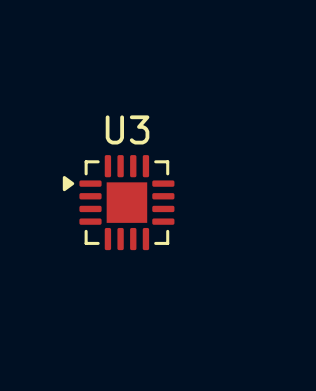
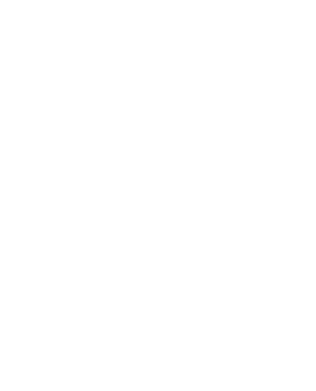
U3: (118, 202) -> none

